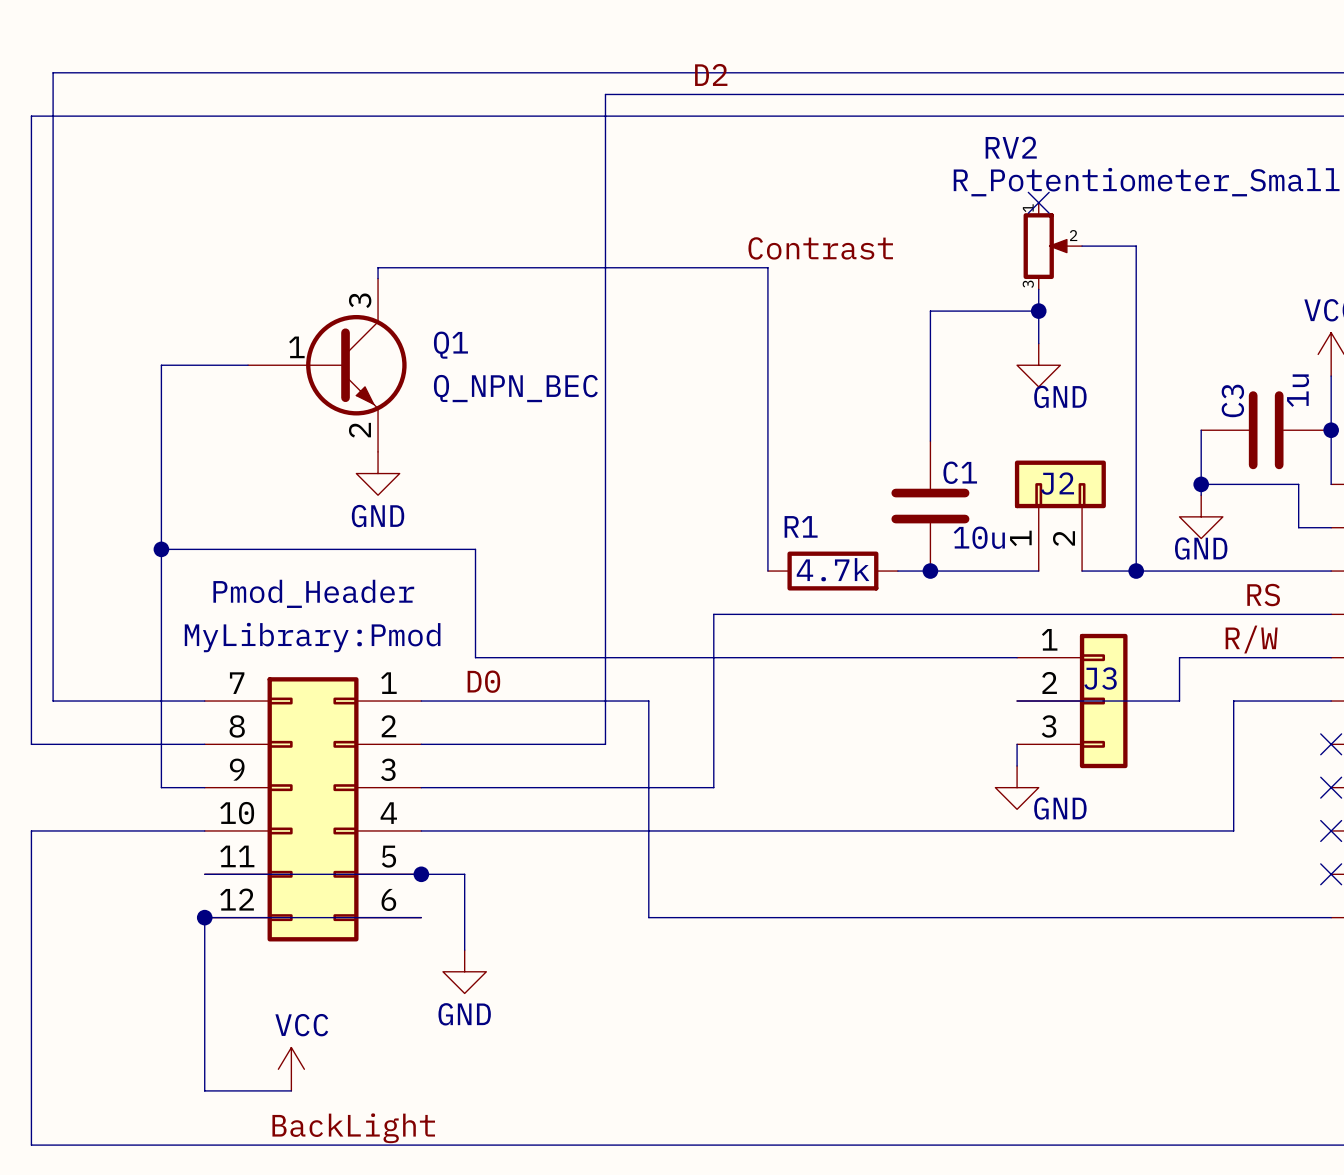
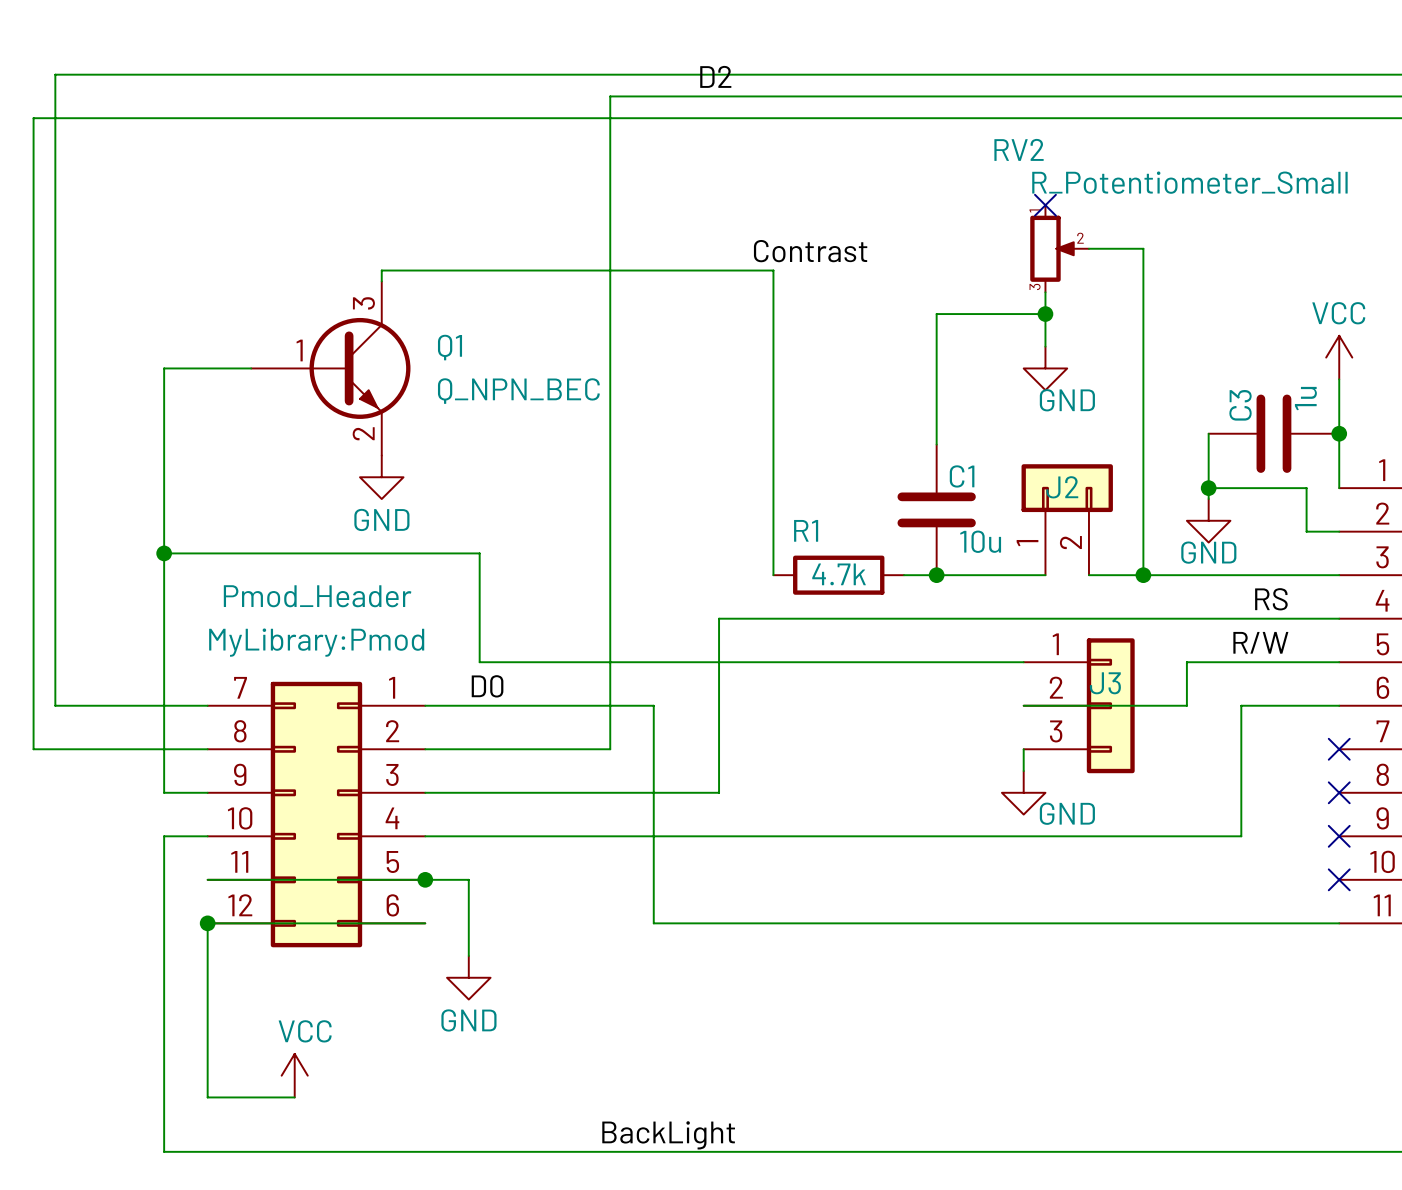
wire: (161, 830) (31, 830) (31, 1145) (161, 1145) -> (164, 836) (164, 1151)
label position: BackLight (353, 1128) -> BackLight (668, 1135)

